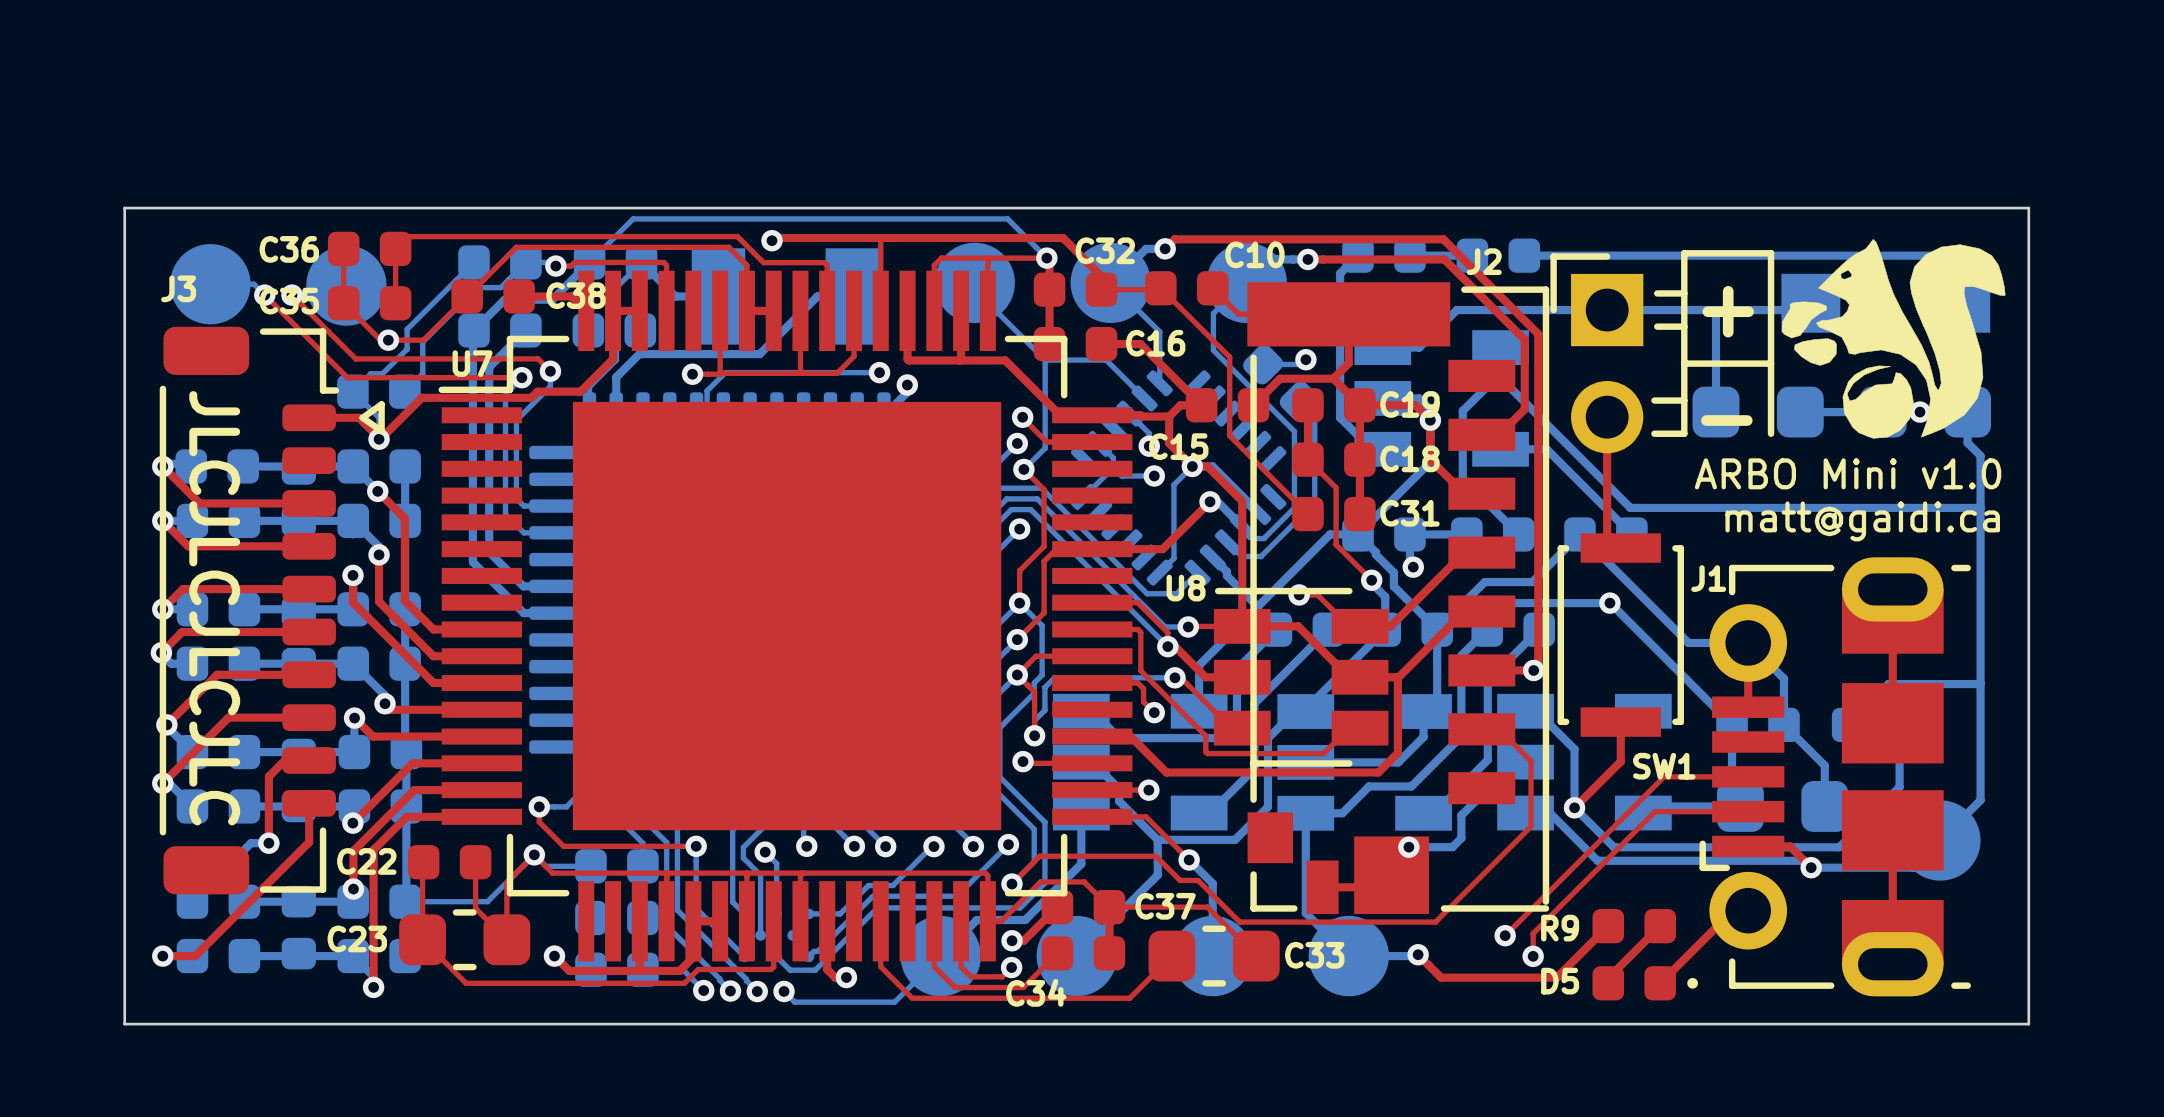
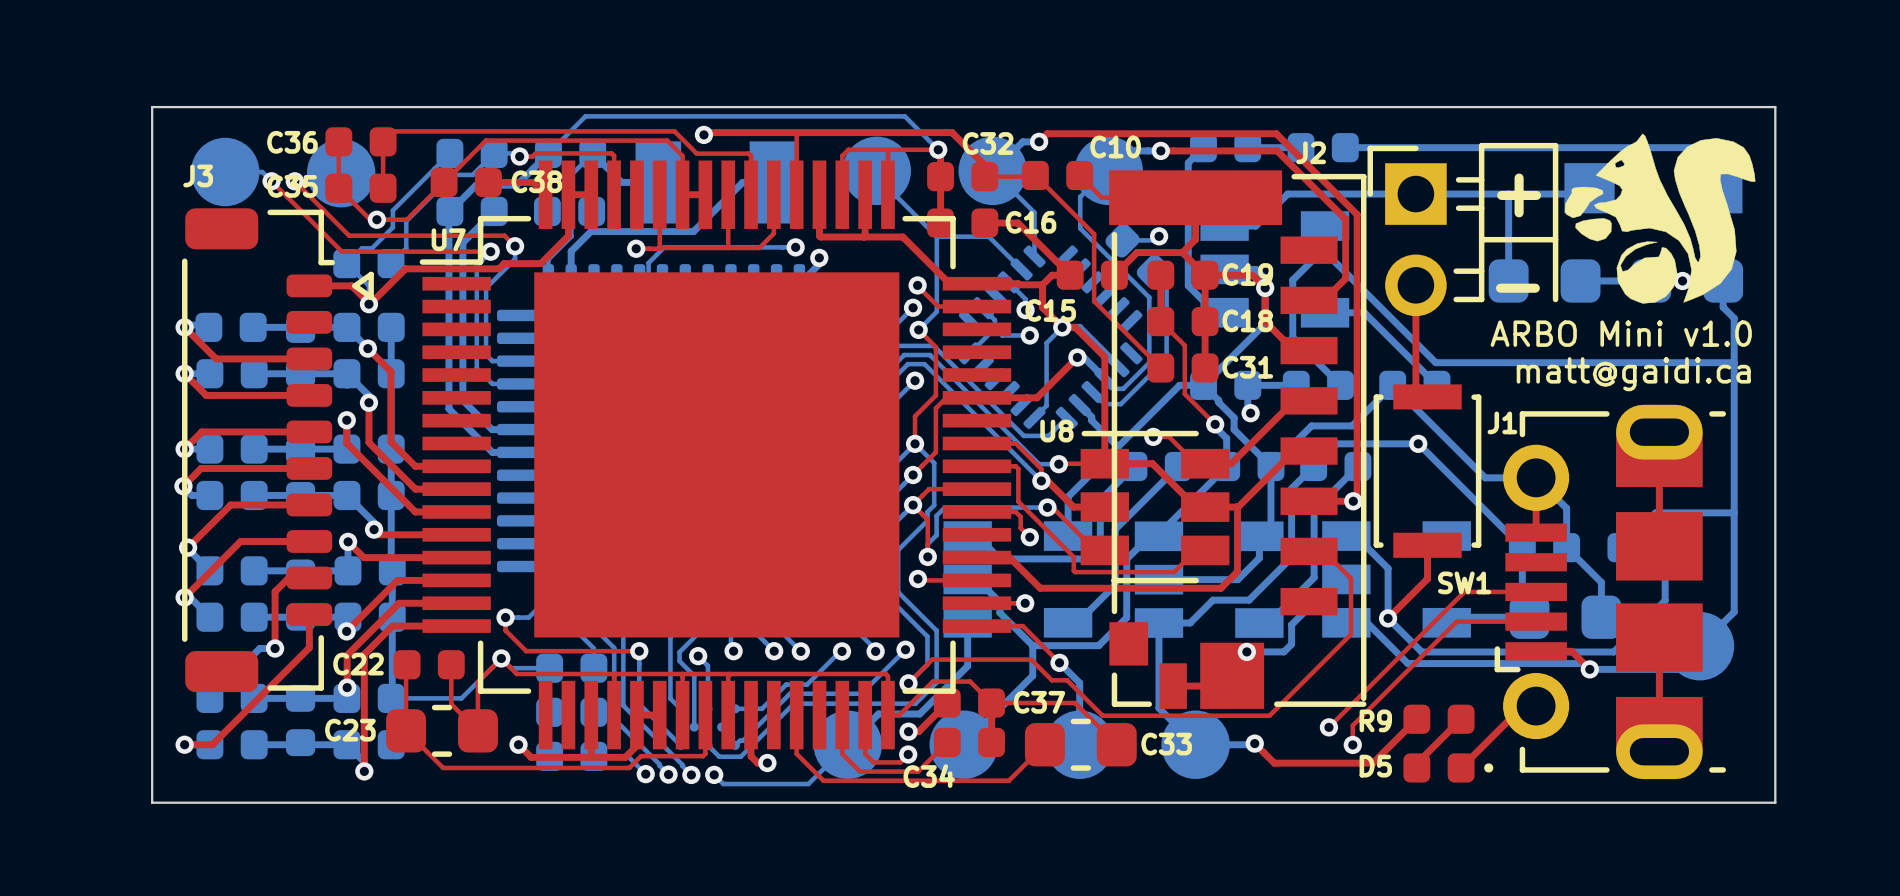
text: JLCJLCJLCJLC (214, 608) -> none

